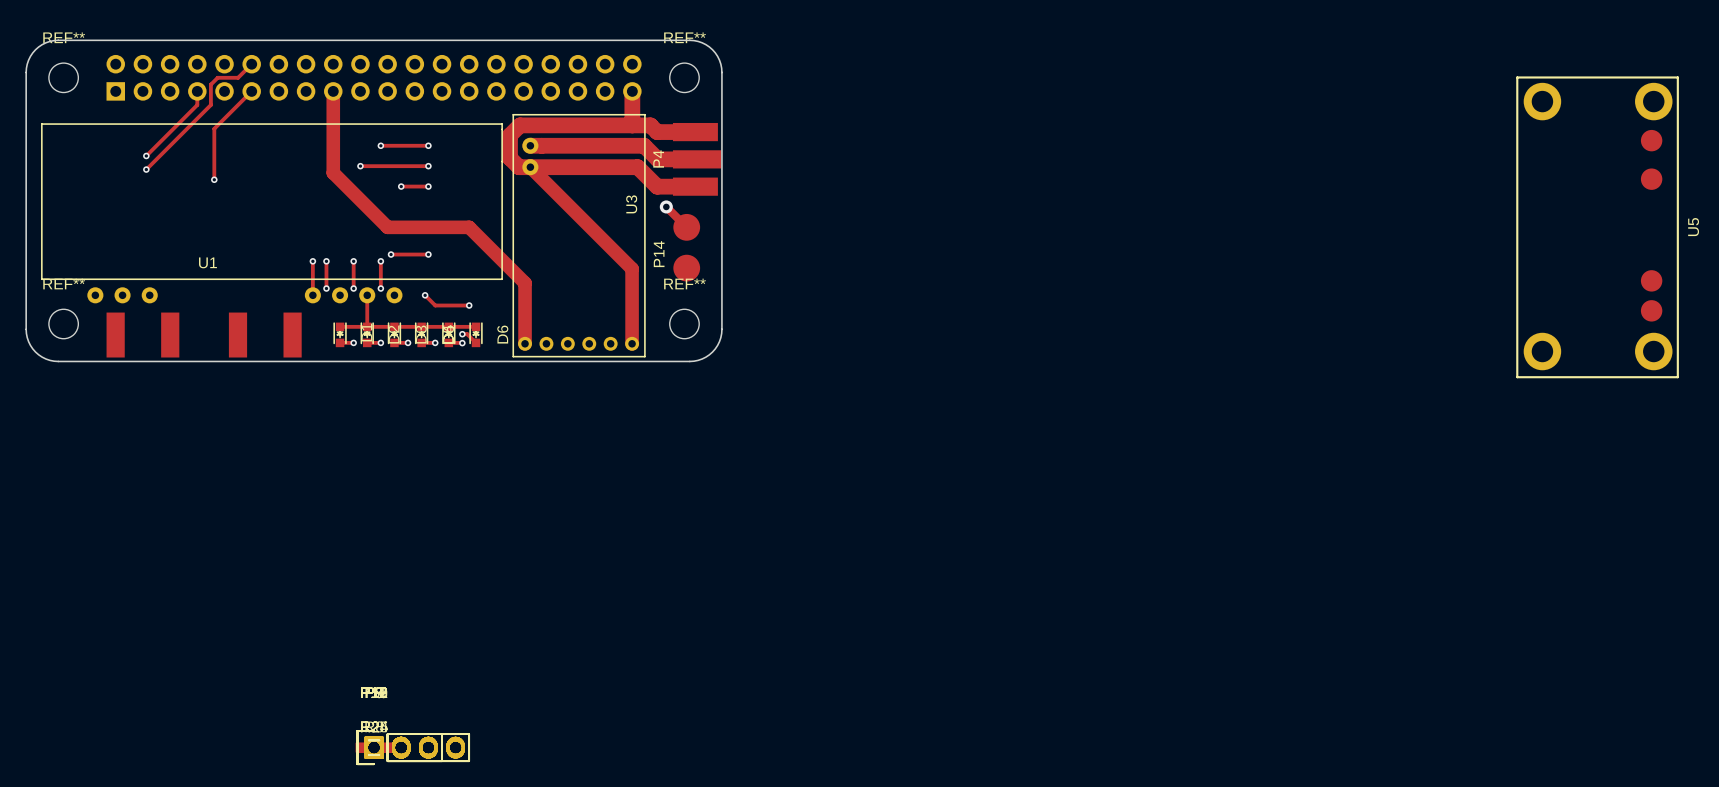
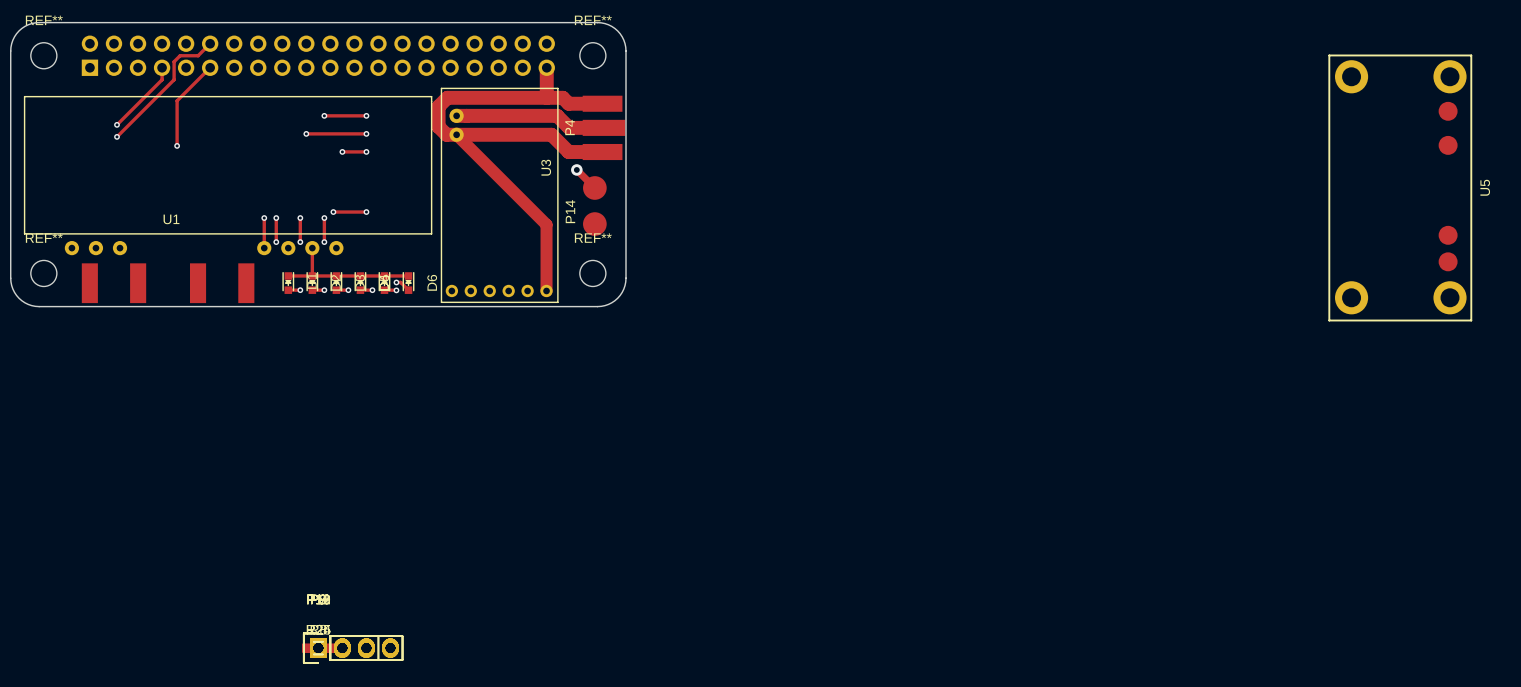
track: (333, 91) (333, 172) (387, 227) (469, 227) (525, 283) (525, 343) -> none
track: (425, 295) (435, 305) (469, 305) -> none
via: (425, 295) -> none
via: (469, 305) -> none

